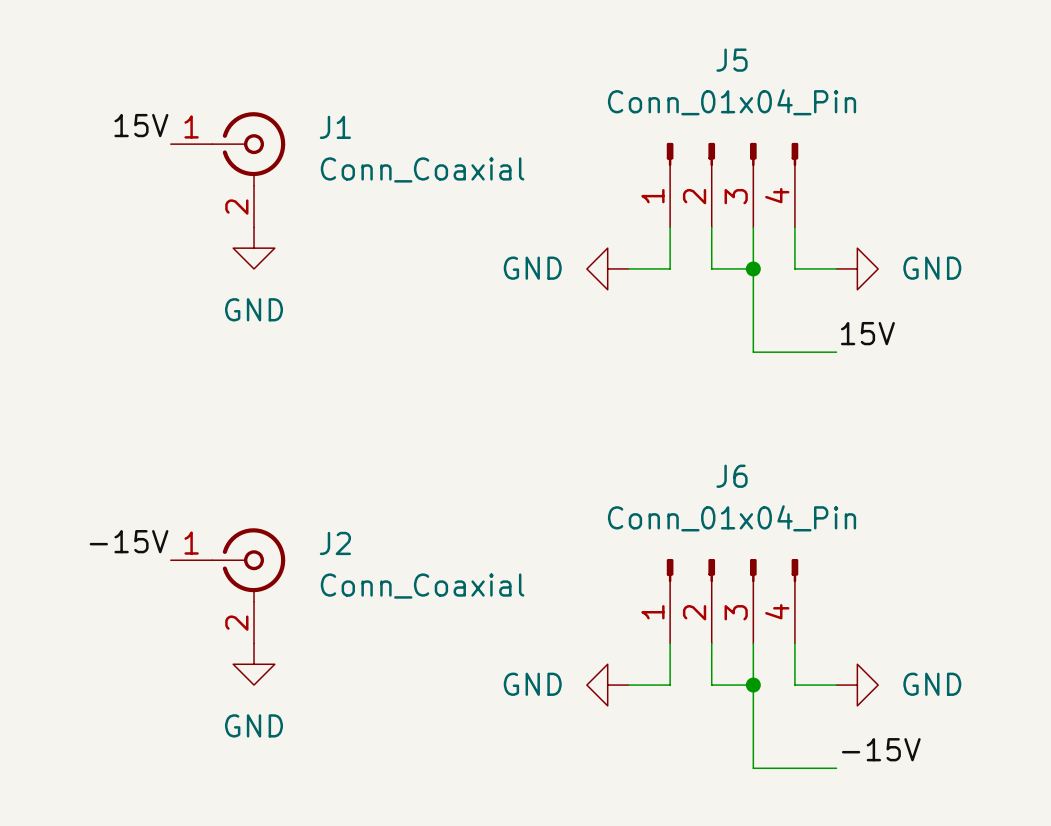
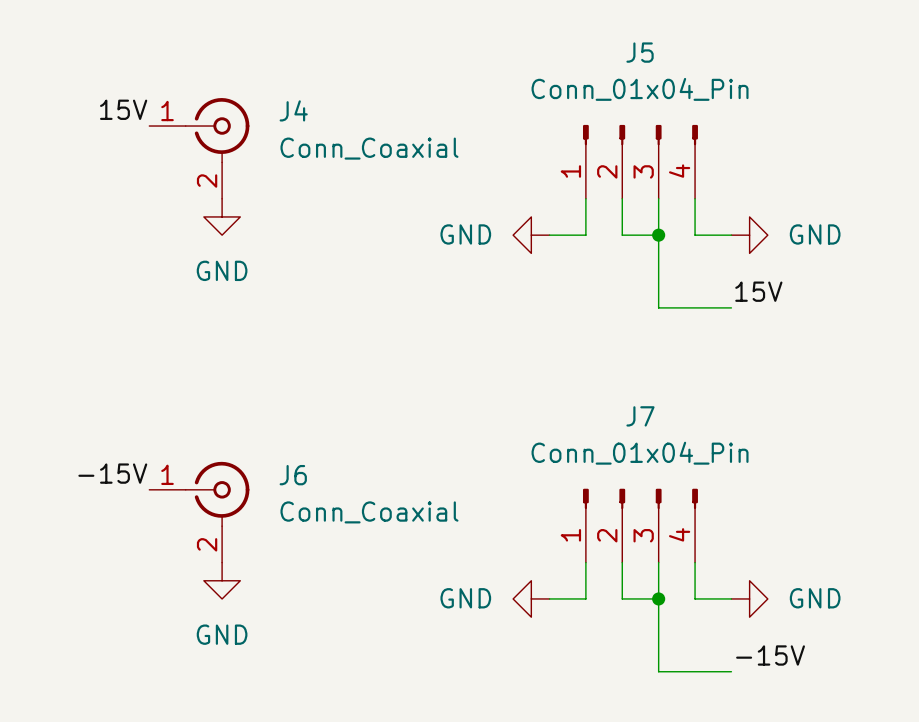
J1 name: J1 (335, 127) -> J4 (293, 110)
J6 name: J6 (732, 476) -> J7 (640, 416)
J2 name: J2 (335, 543) -> J6 (293, 475)

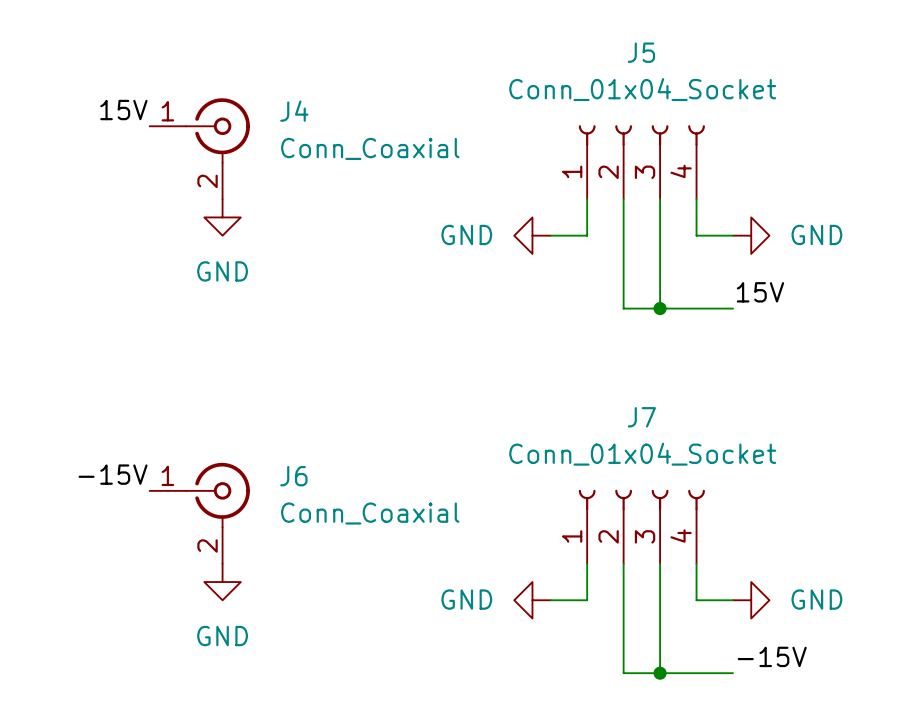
J5 value: Conn_01x04_Pin (640, 89) -> Conn_01x04_Socket (642, 89)
J5 symbol: [582, 124, 698, 199] -> [578, 125, 705, 200]
wire: (622, 235) (658, 235) -> (623, 235) (623, 308) (660, 308)
junction position: (658, 235) -> (660, 308)
J7 value: Conn_01x04_Pin (640, 453) -> Conn_01x04_Socket (642, 454)
J7 symbol: [582, 488, 698, 563] -> [578, 489, 705, 564]
wire: (622, 598) (658, 598) -> (623, 600) (623, 673) (660, 673)
junction position: (658, 598) -> (660, 673)

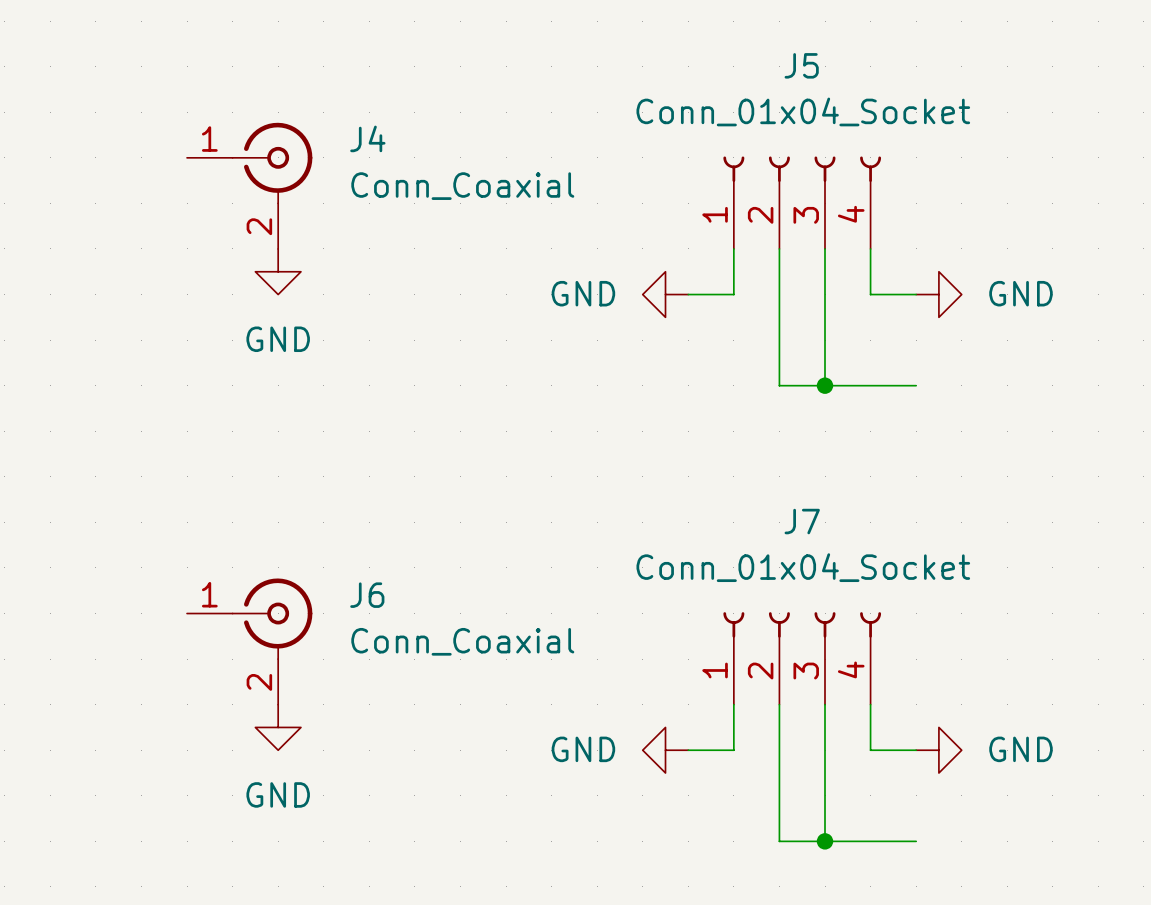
label: 15V (123, 110) -> none
label: 15V (760, 292) -> none
label: -15V (113, 474) -> none
label: -15V (772, 656) -> none

